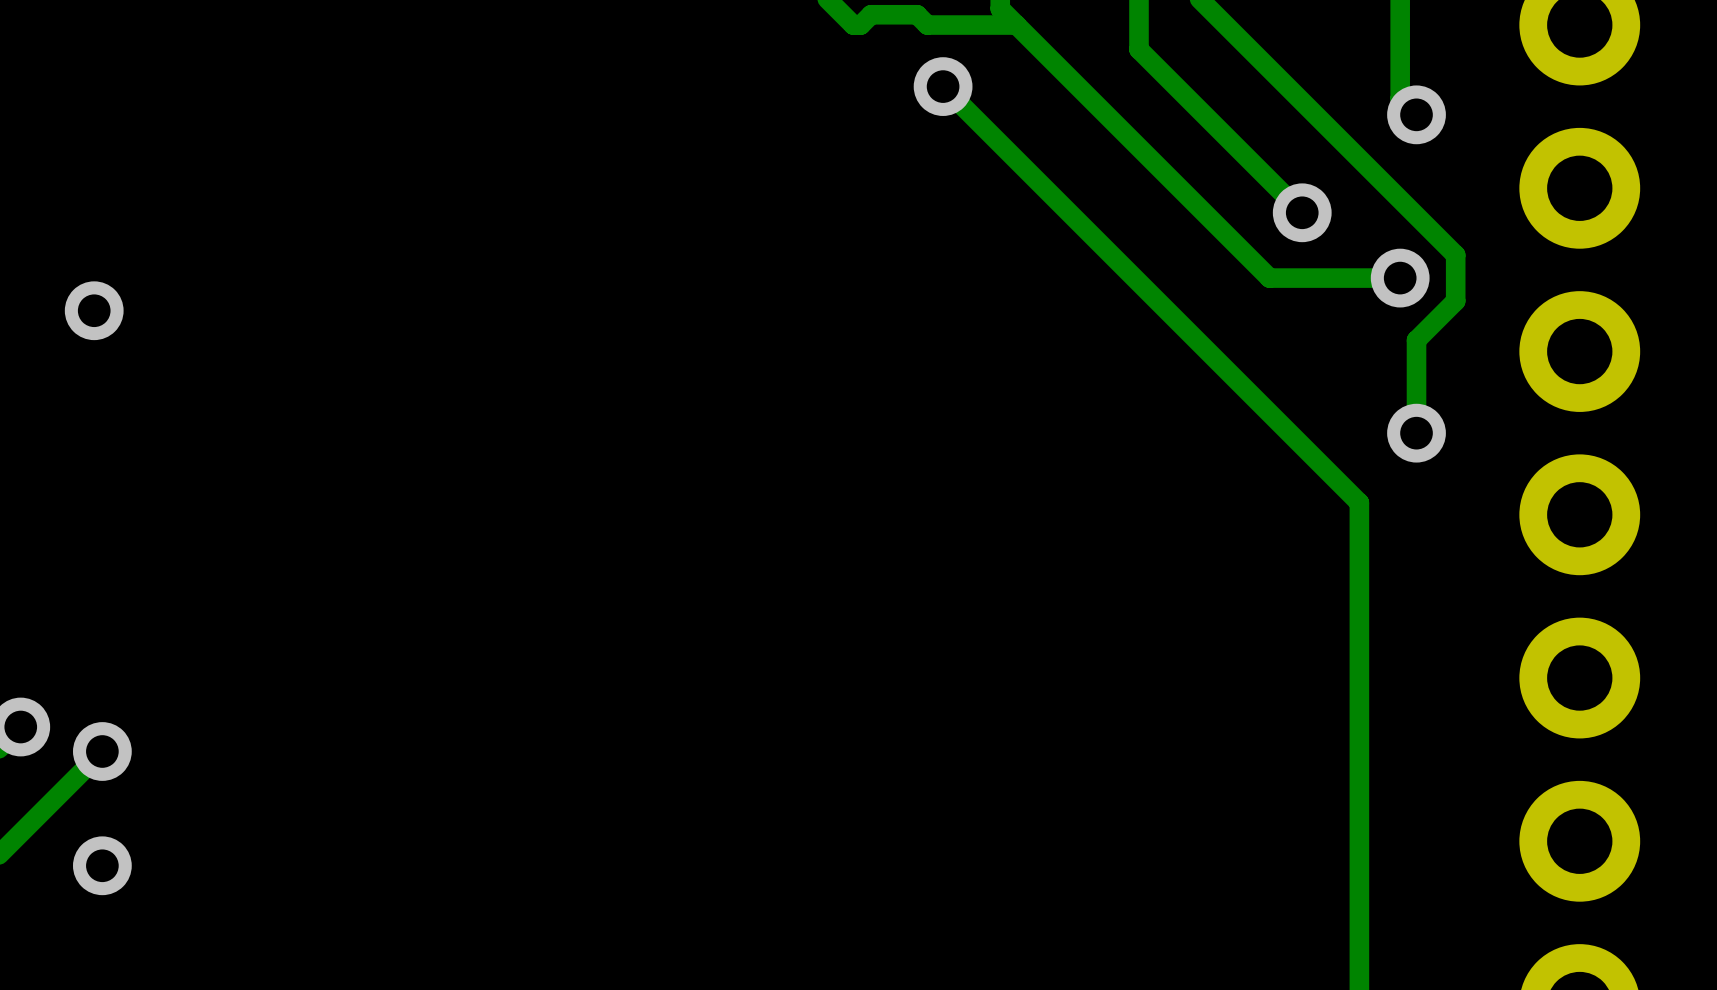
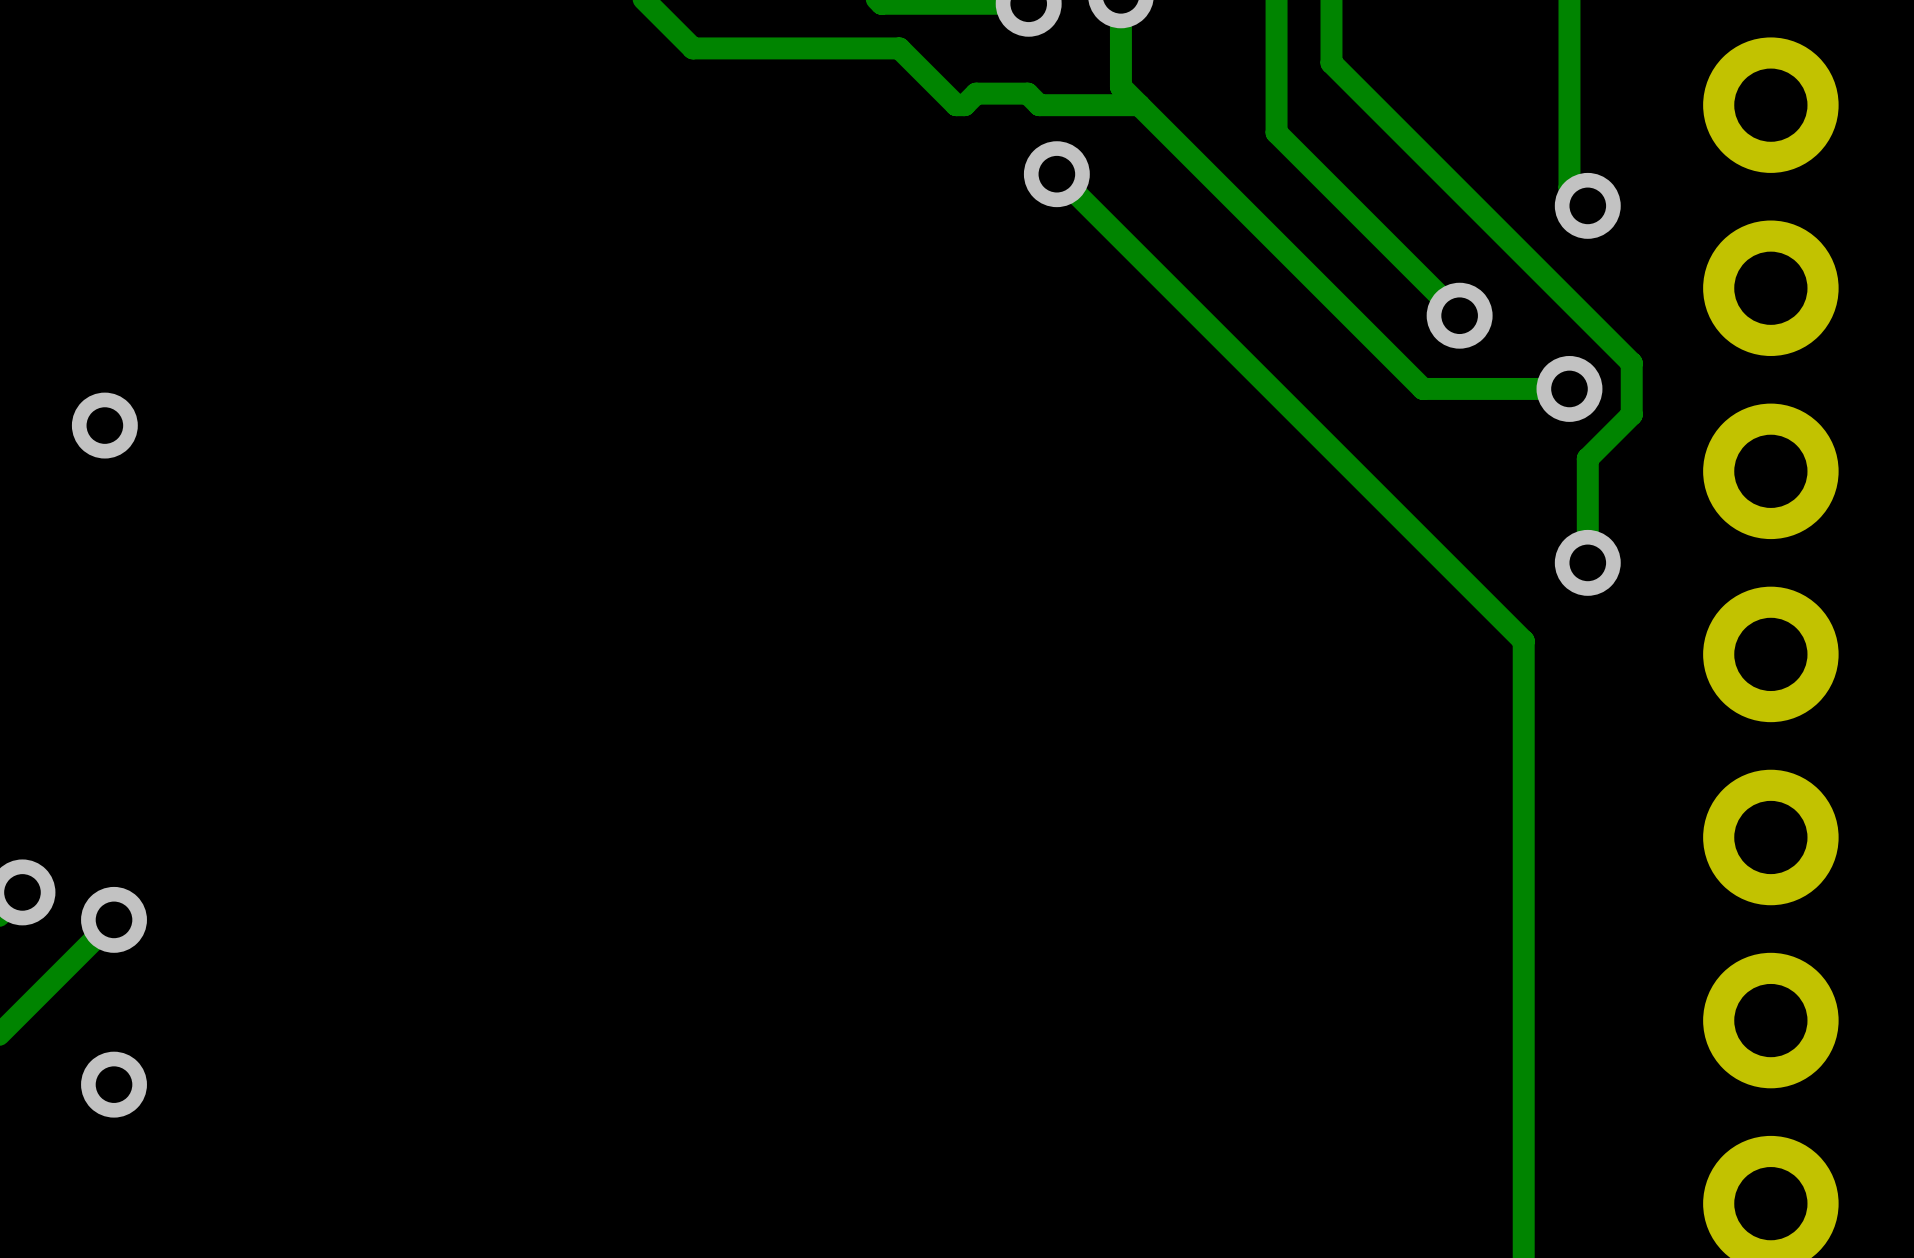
via position: (102, 865) -> (114, 1084)

